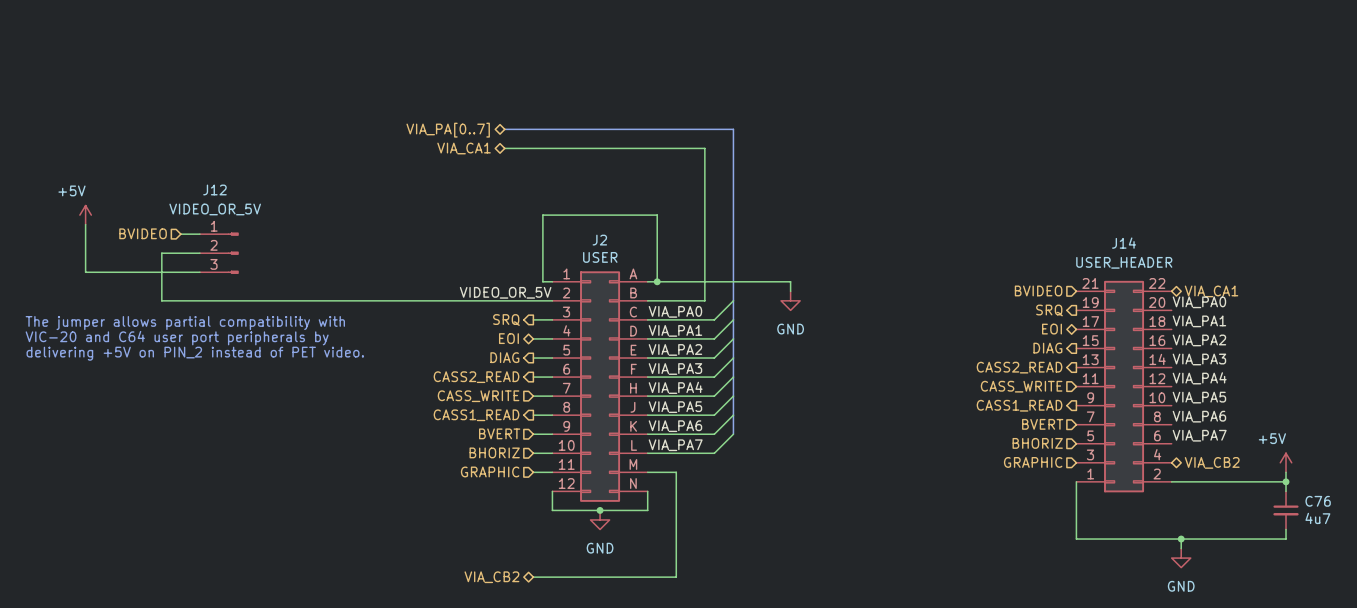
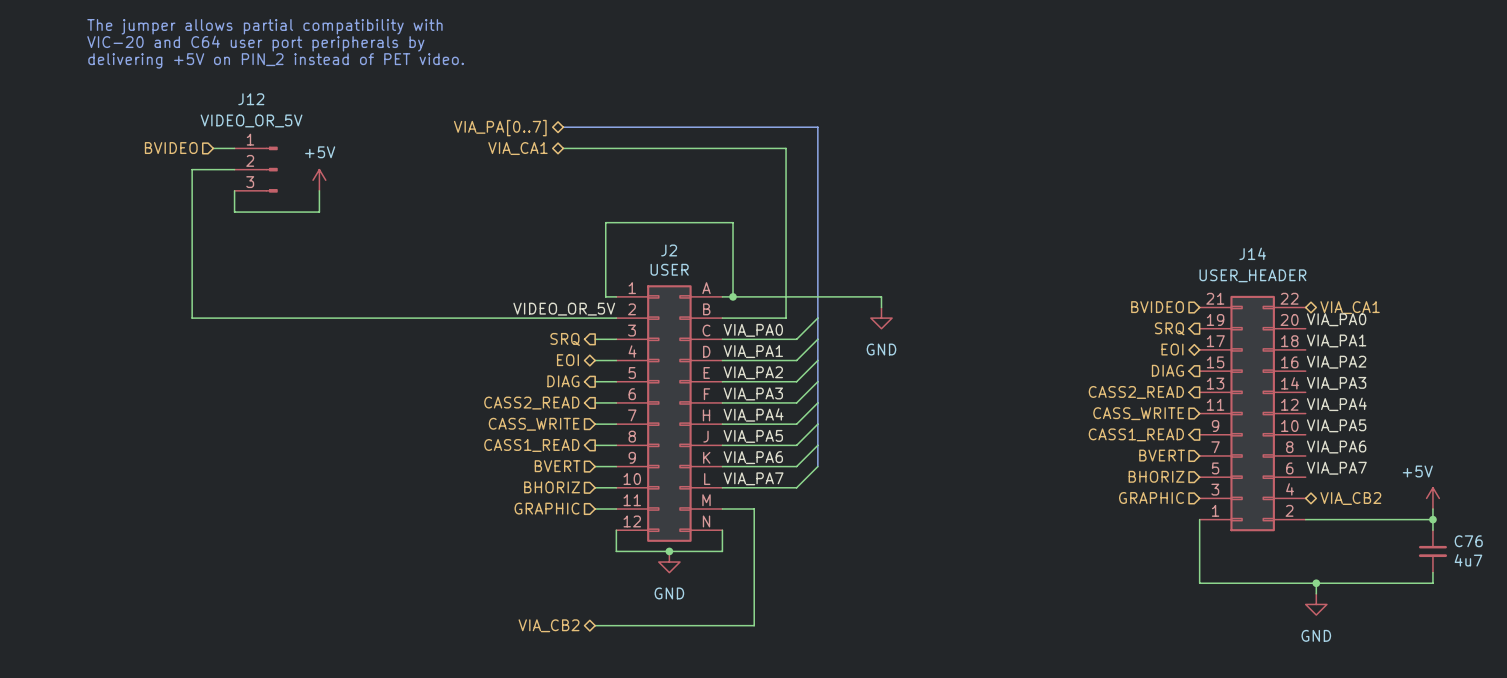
text: none -> The jumper allows partial compatibility with (264, 26)
text: none -> VIC-20 and C64 user port peripherals by (255, 43)
text: none -> delivering +5V on PIN_2 instead of PET video. (276, 60)
power symbol: none -> +5V (319, 180)
wire: none -> (234, 190) (234, 212) (319, 212) (319, 190)
power symbol: +5V (85, 215) -> none
wire: (85, 224) (85, 272) (199, 272) -> none
hierarchical label position: BVIDEO (143, 233) -> BVIDEO (171, 148)
wire: (180, 234) (199, 234) -> (213, 148) (234, 148)
wire: (199, 253) (161, 253) (161, 300) (171, 300) -> (234, 169) (192, 169) (192, 318)
J12 position: (219, 253) -> (256, 169)
text: The jumper allows partial compatibility with (185, 323) -> none
text: VIC-20 and C64 user port peripherals by (177, 338) -> none
text: delivering +5V on PIN_2 instead of PET video. (195, 353) -> none

